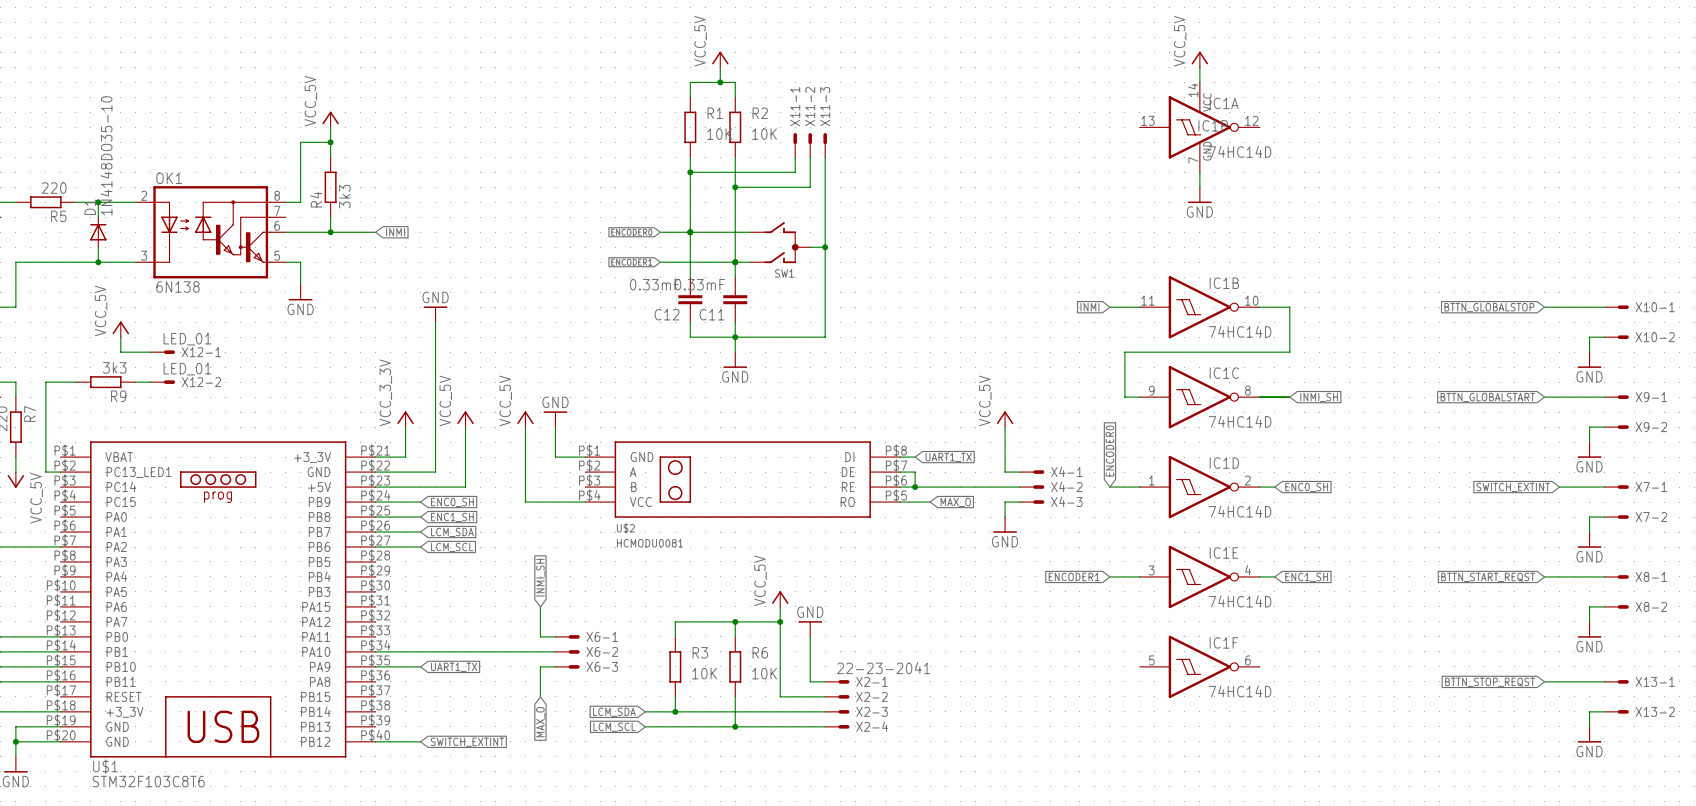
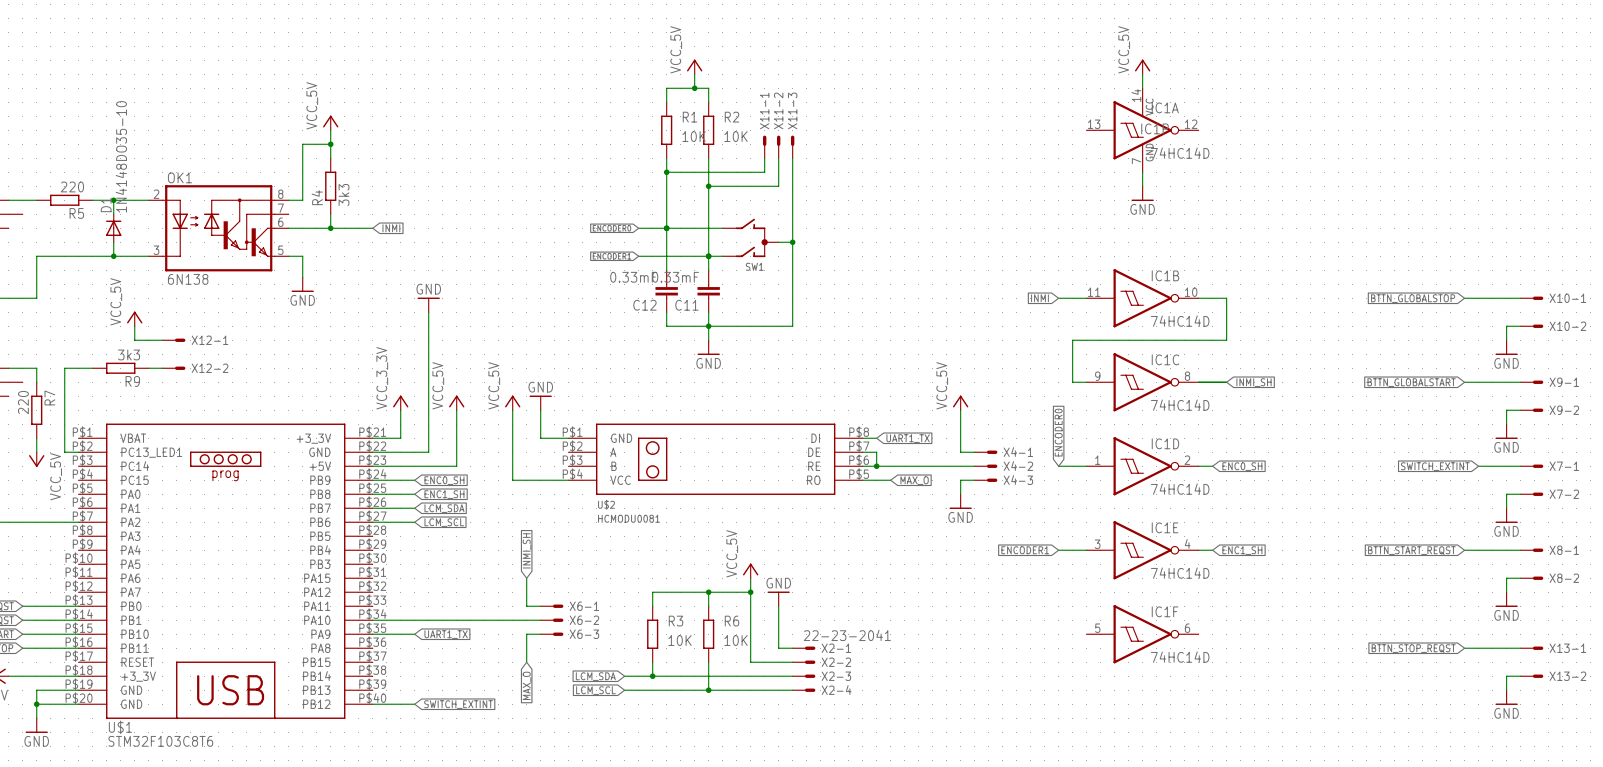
X12-1 value: LED_01 (187, 339) -> none
X12-2 value: LED_01 (187, 369) -> none

